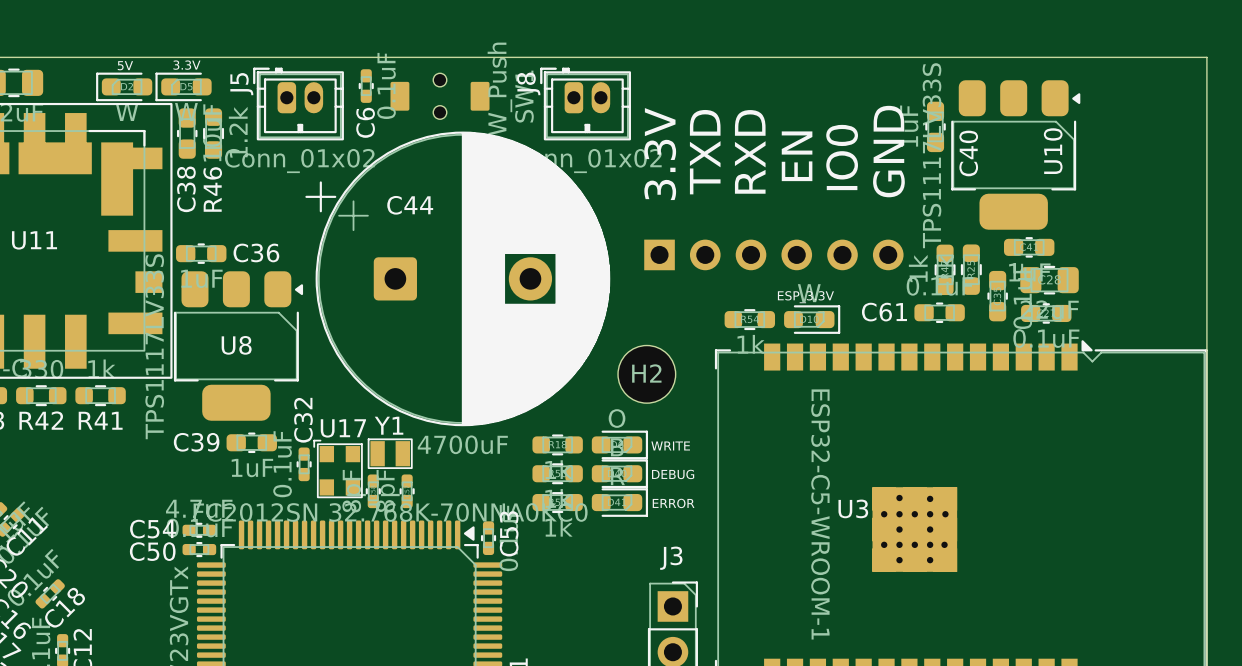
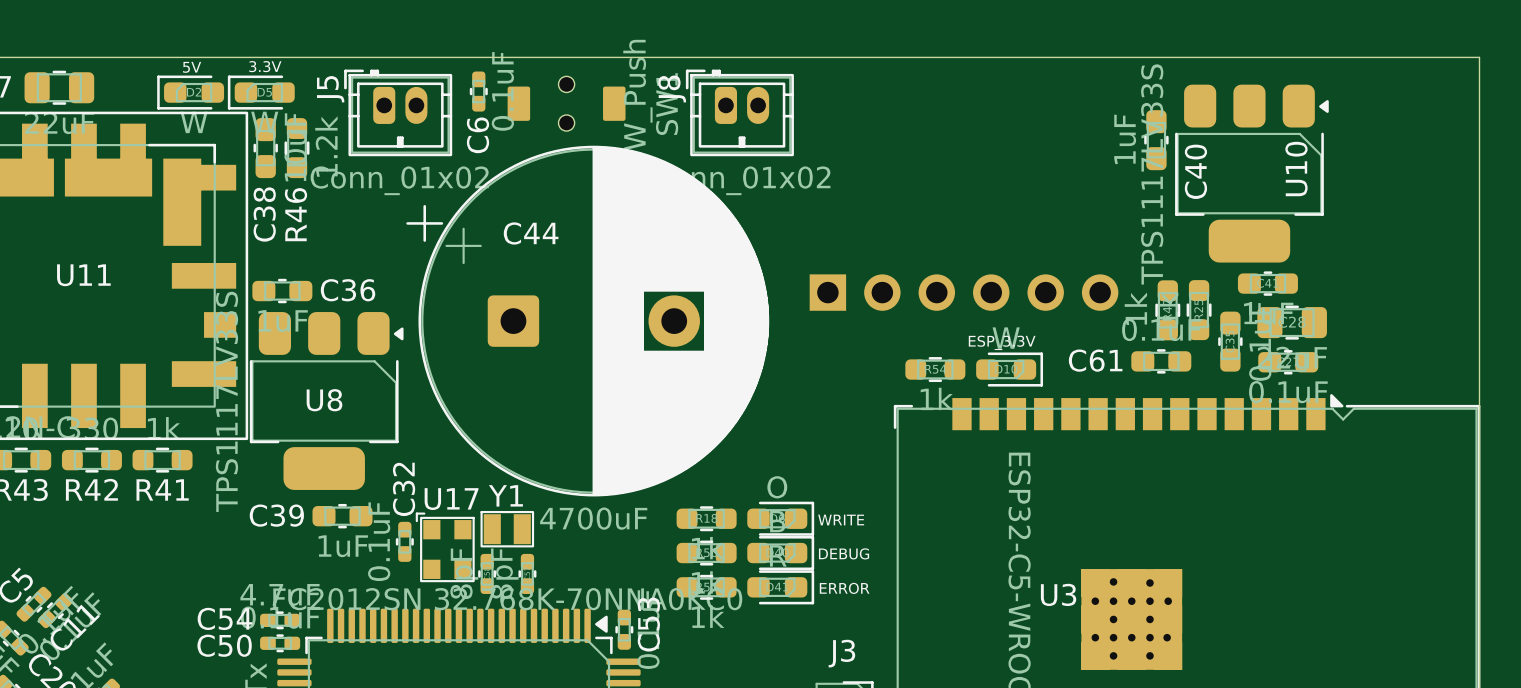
text: RXD (750, 151) -> none
text: GND (888, 151) -> none
text: TXD (705, 152) -> none
text: 3.3V (660, 154) -> none
text: EN (797, 156) -> none
text: IO0 (842, 157) -> none
H2: (646, 374) -> none

